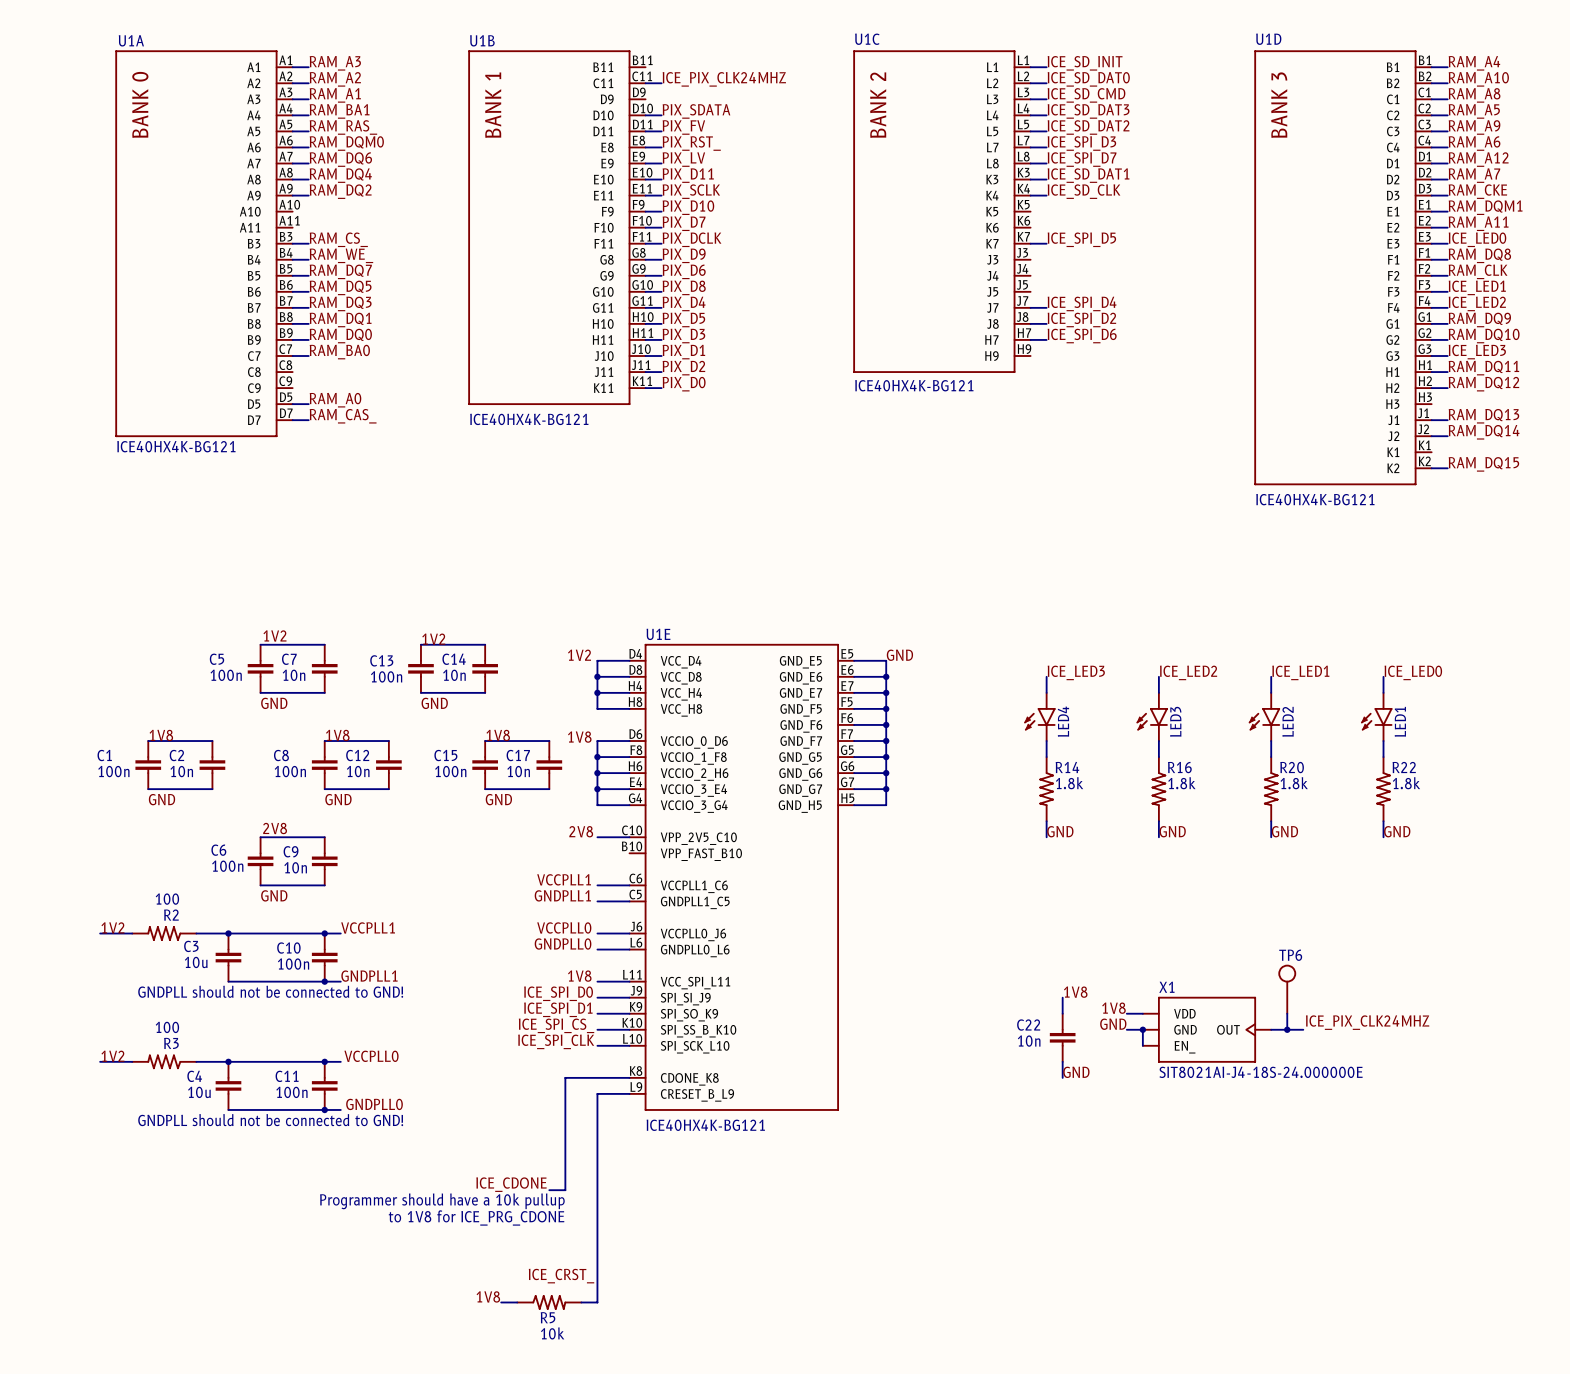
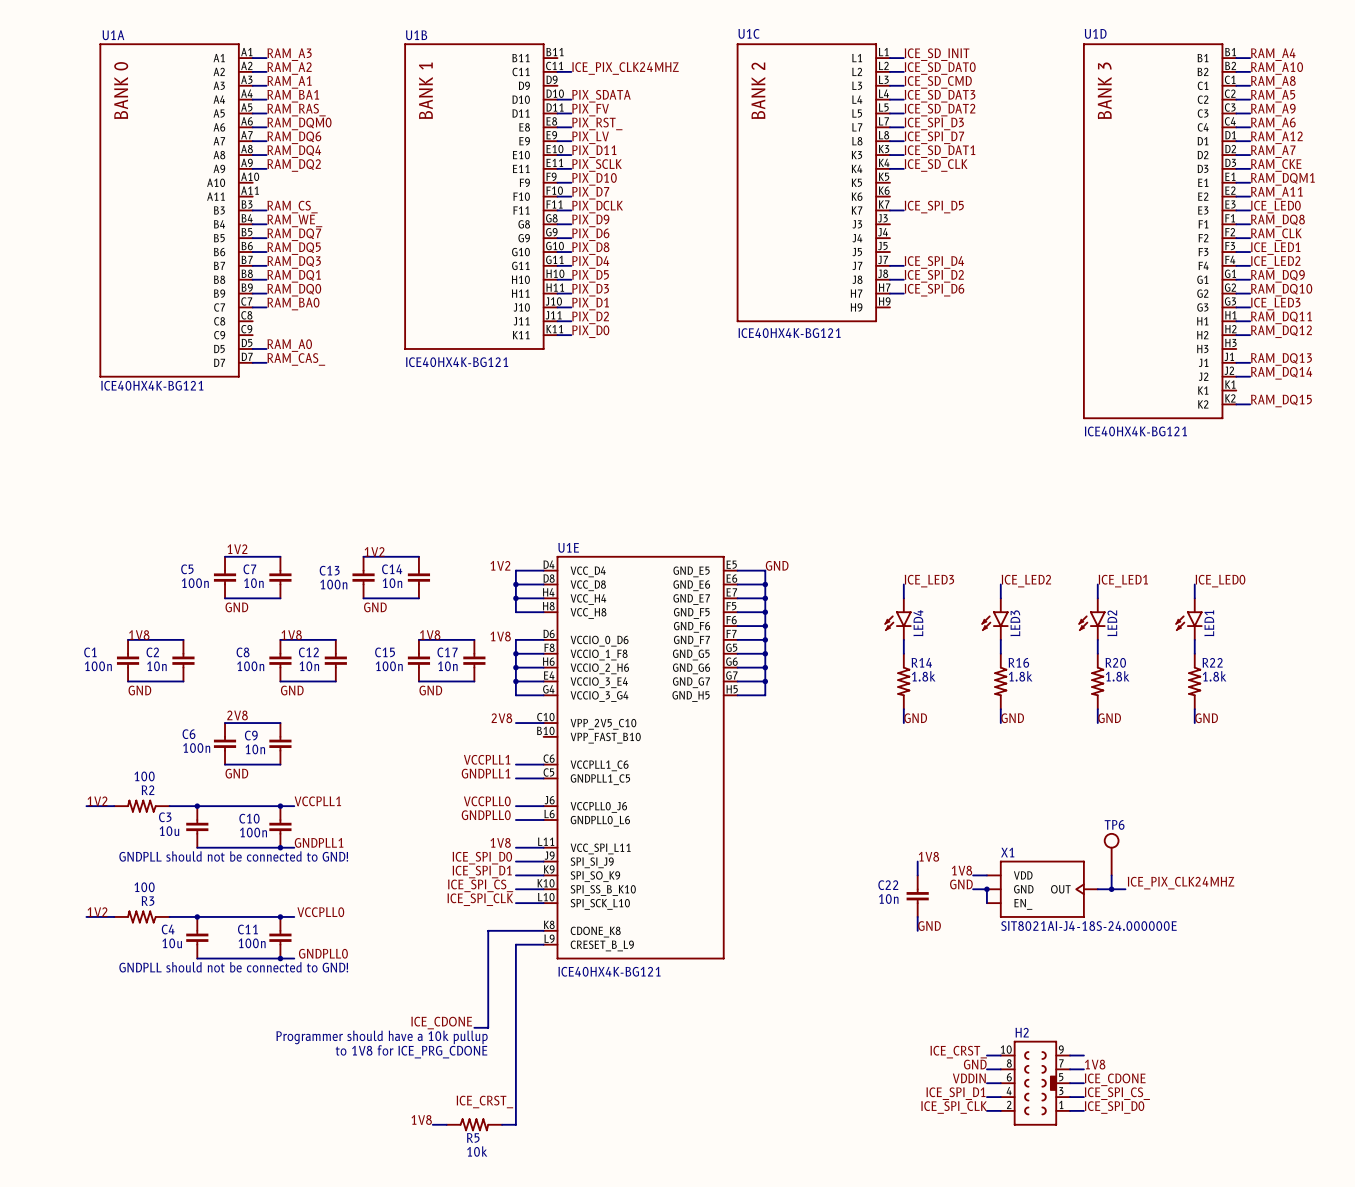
label: none -> ICE_CRST_ (958, 1052)
wire: none -> (986, 1055) (1000, 1055)
wire: none -> (1070, 1055) (1083, 1055)
label: none -> GND (975, 1064)
label: none -> 1V8 (1095, 1064)
wire: none -> (986, 1069) (1000, 1069)
wire: none -> (1070, 1069) (1083, 1069)
label: none -> VDDIN (969, 1078)
label: none -> ICE_CDONE (1115, 1079)
wire: none -> (986, 1083) (1000, 1083)
H2: none -> (1035, 1083)
wire: none -> (1070, 1083) (1083, 1083)
label: none -> ICE_SPI_D1 (955, 1093)
label: none -> ICE_SPI_CS_ (1117, 1093)
wire: none -> (986, 1097) (1000, 1097)
wire: none -> (1070, 1097) (1083, 1097)
label: none -> ICE_SPI_CLK (954, 1107)
label: none -> ICE_SPI_D0 (1114, 1107)
wire: none -> (986, 1110) (1000, 1110)
wire: none -> (1070, 1110) (1083, 1110)

